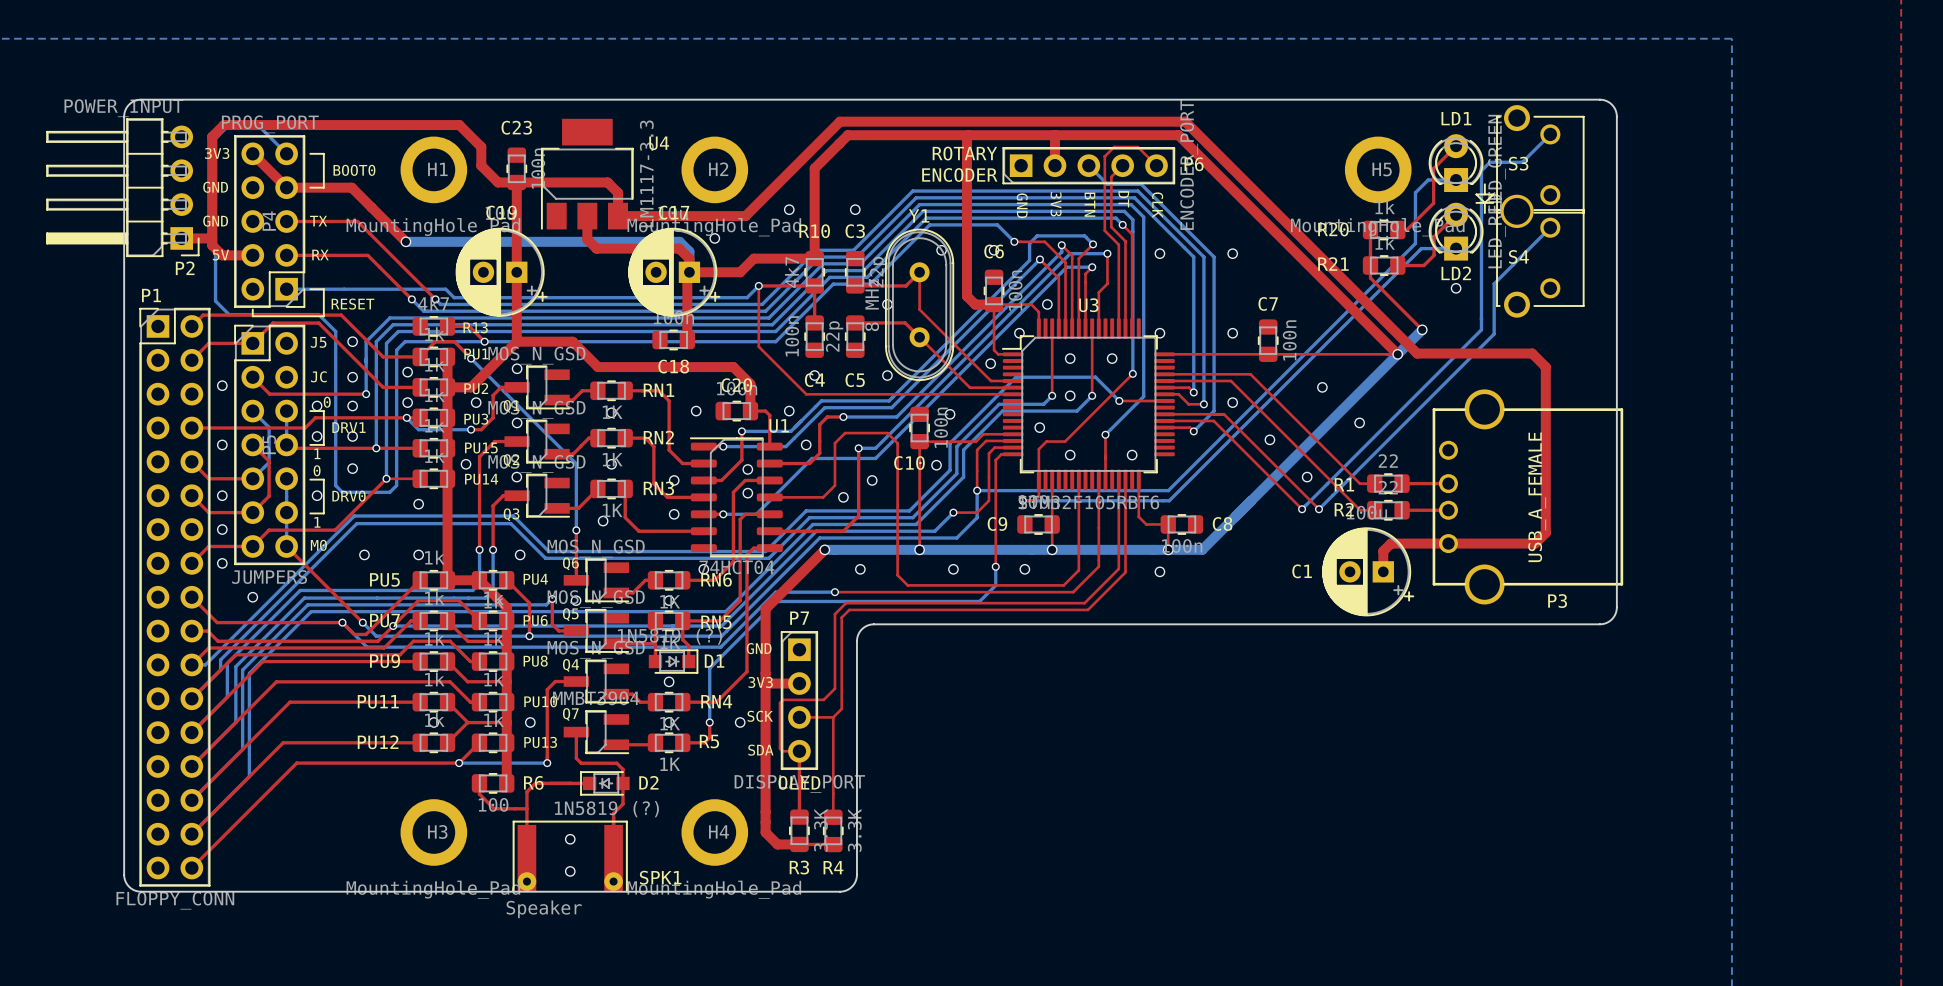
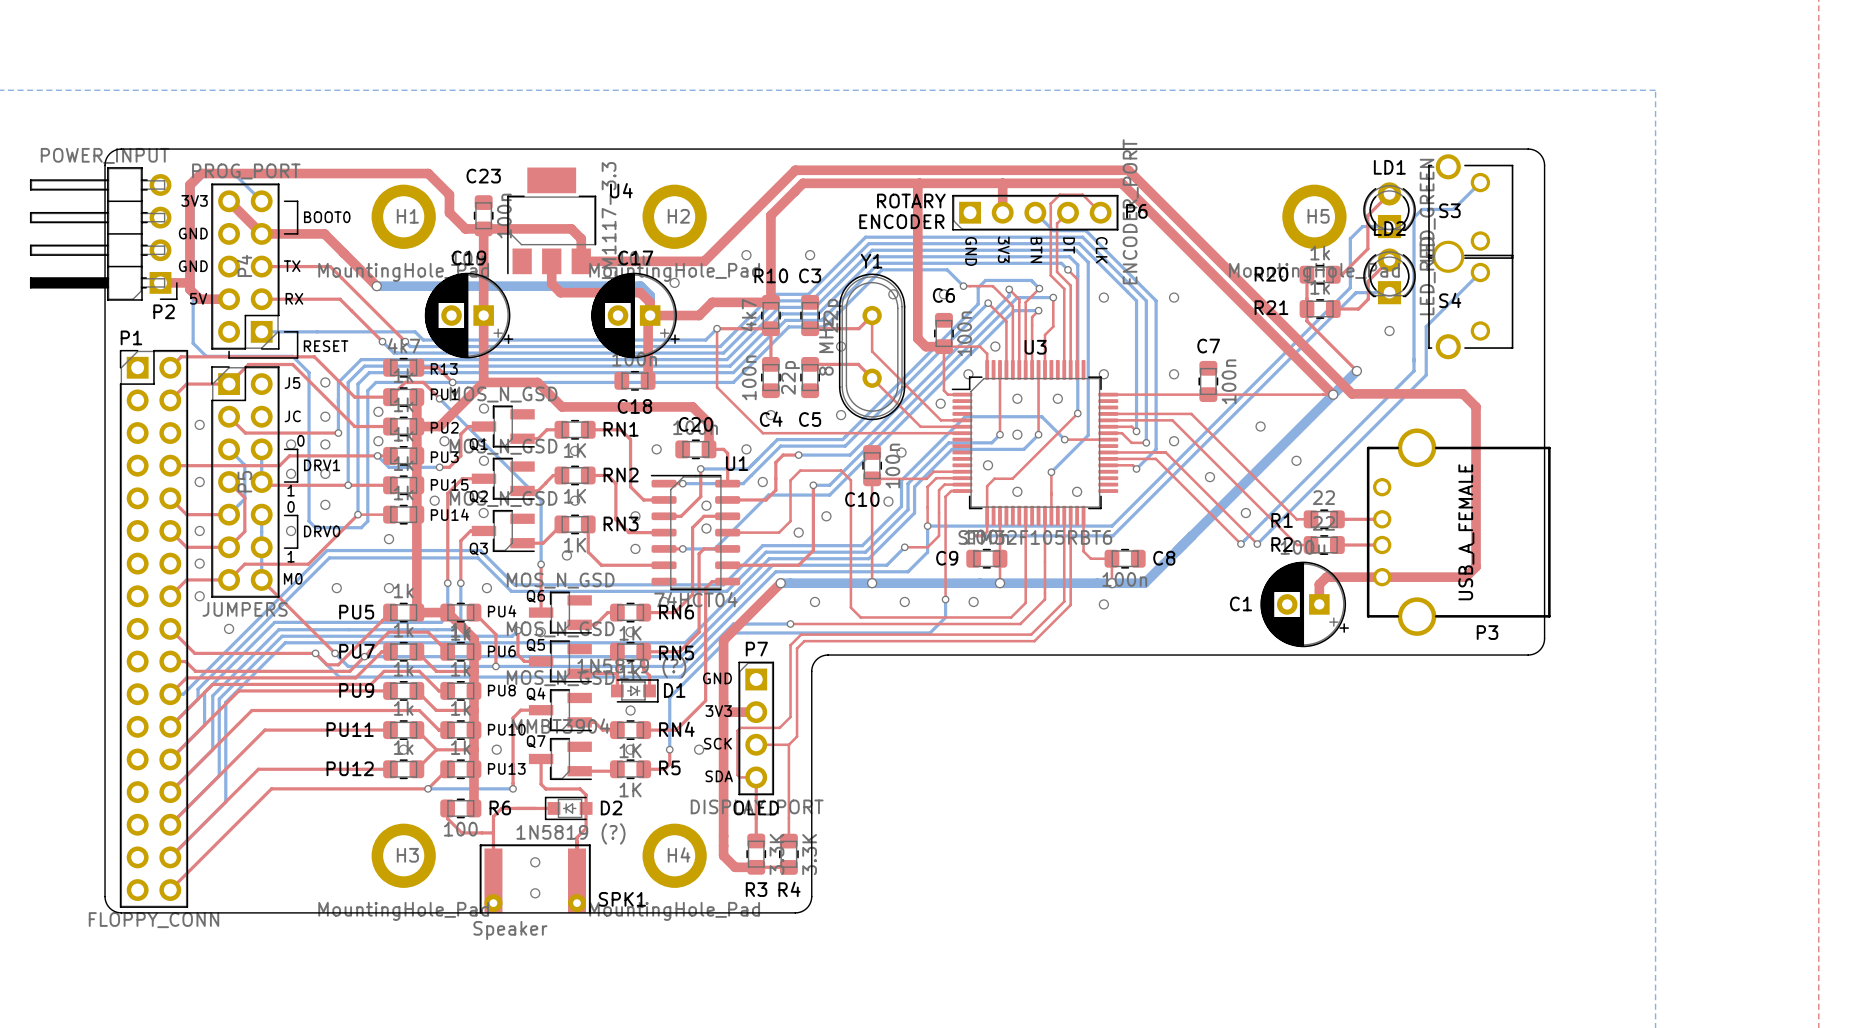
line: (1484, 184) (1484, 194) -> none
line: (1476, 202) (1493, 202) -> none
line: (1484, 202) (1484, 213) -> none
line: (1484, 202) (1476, 194) (1493, 194) (1484, 202) -> none
LD2 name position: LD2 (1456, 273) -> LD2 (1389, 228)

